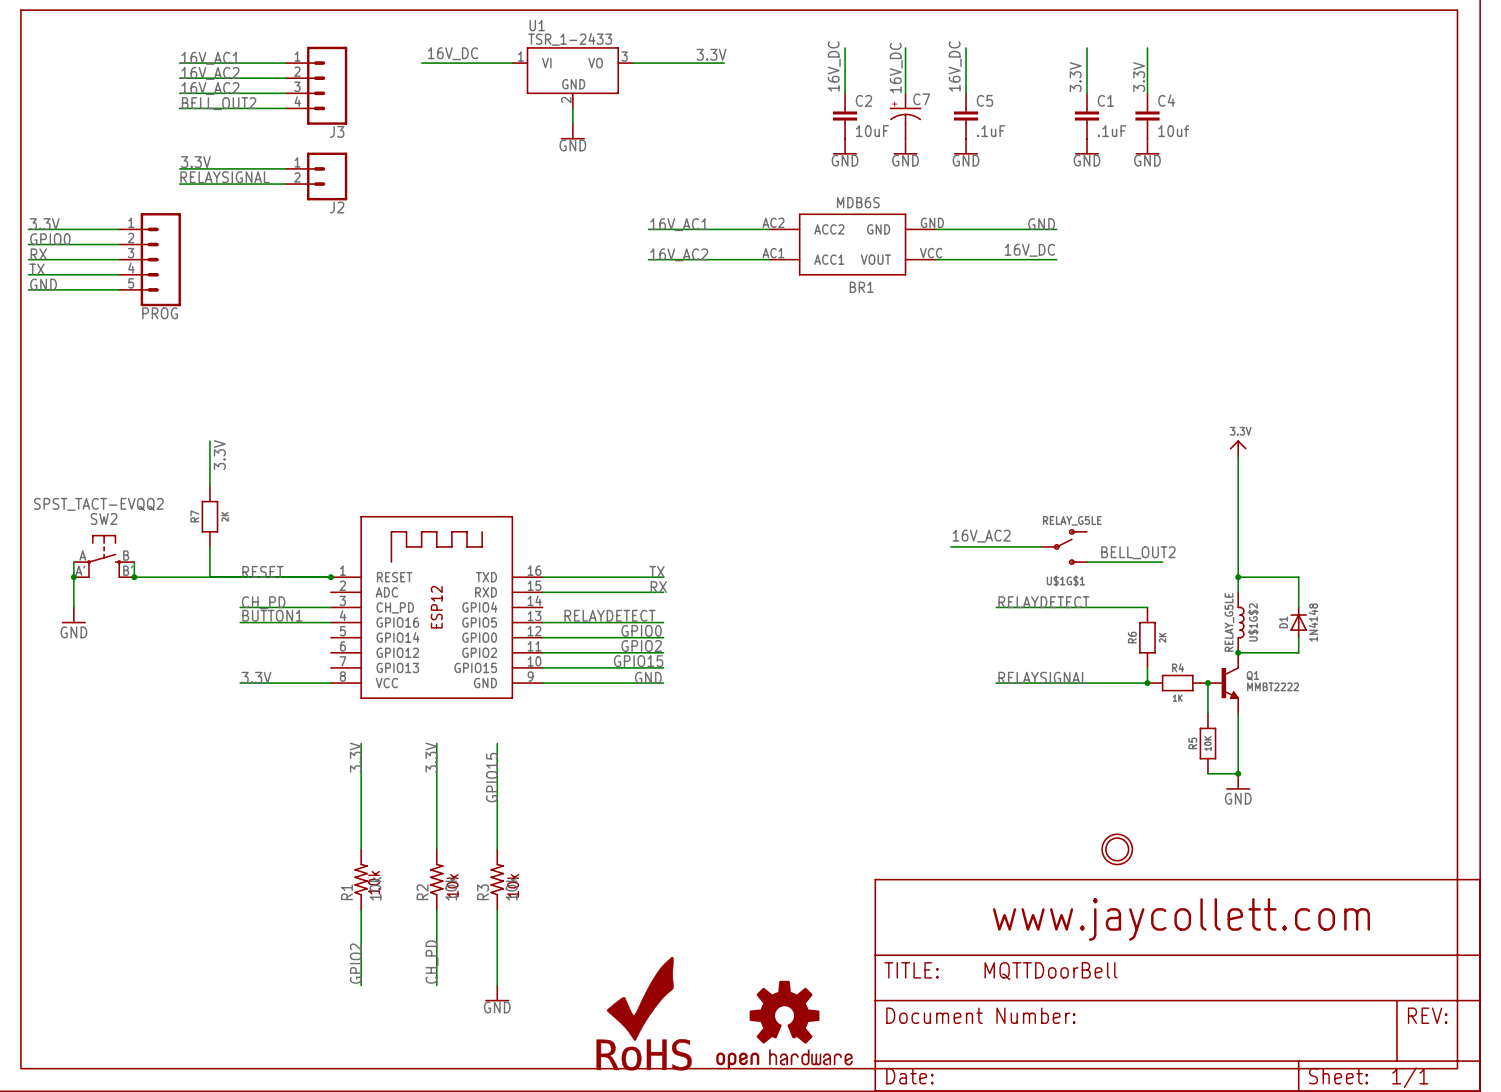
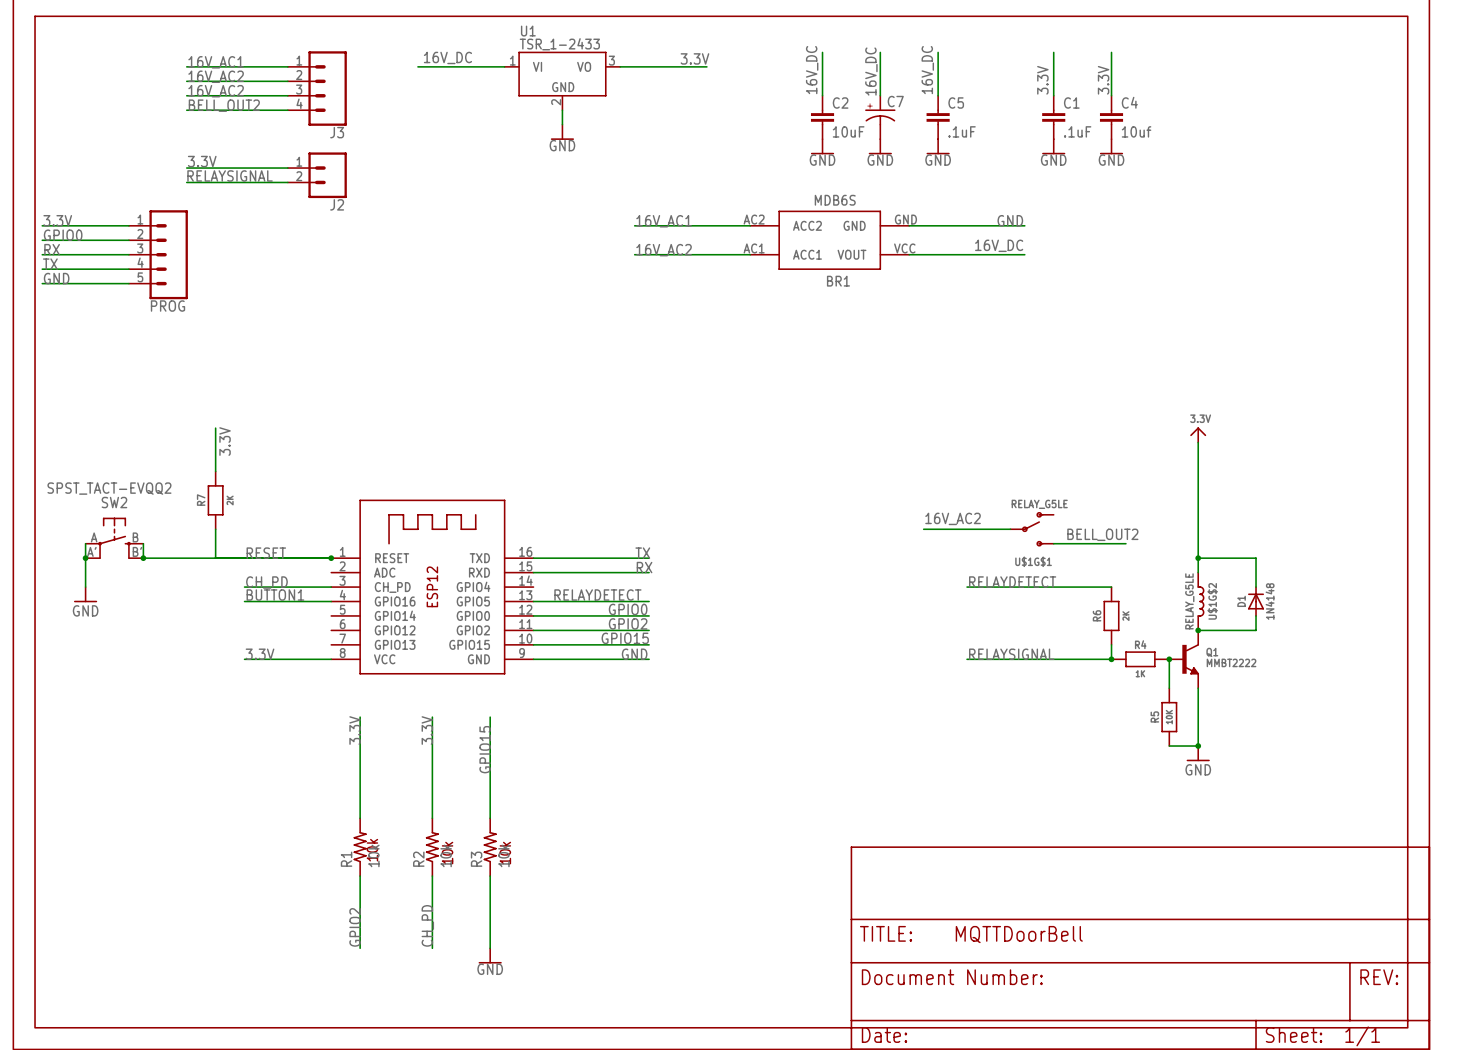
part: (1117, 849) -> none
text: www.jaycollett.com (1181, 919) -> none
part: (644, 1013) -> none
part: (784, 1025) -> none

